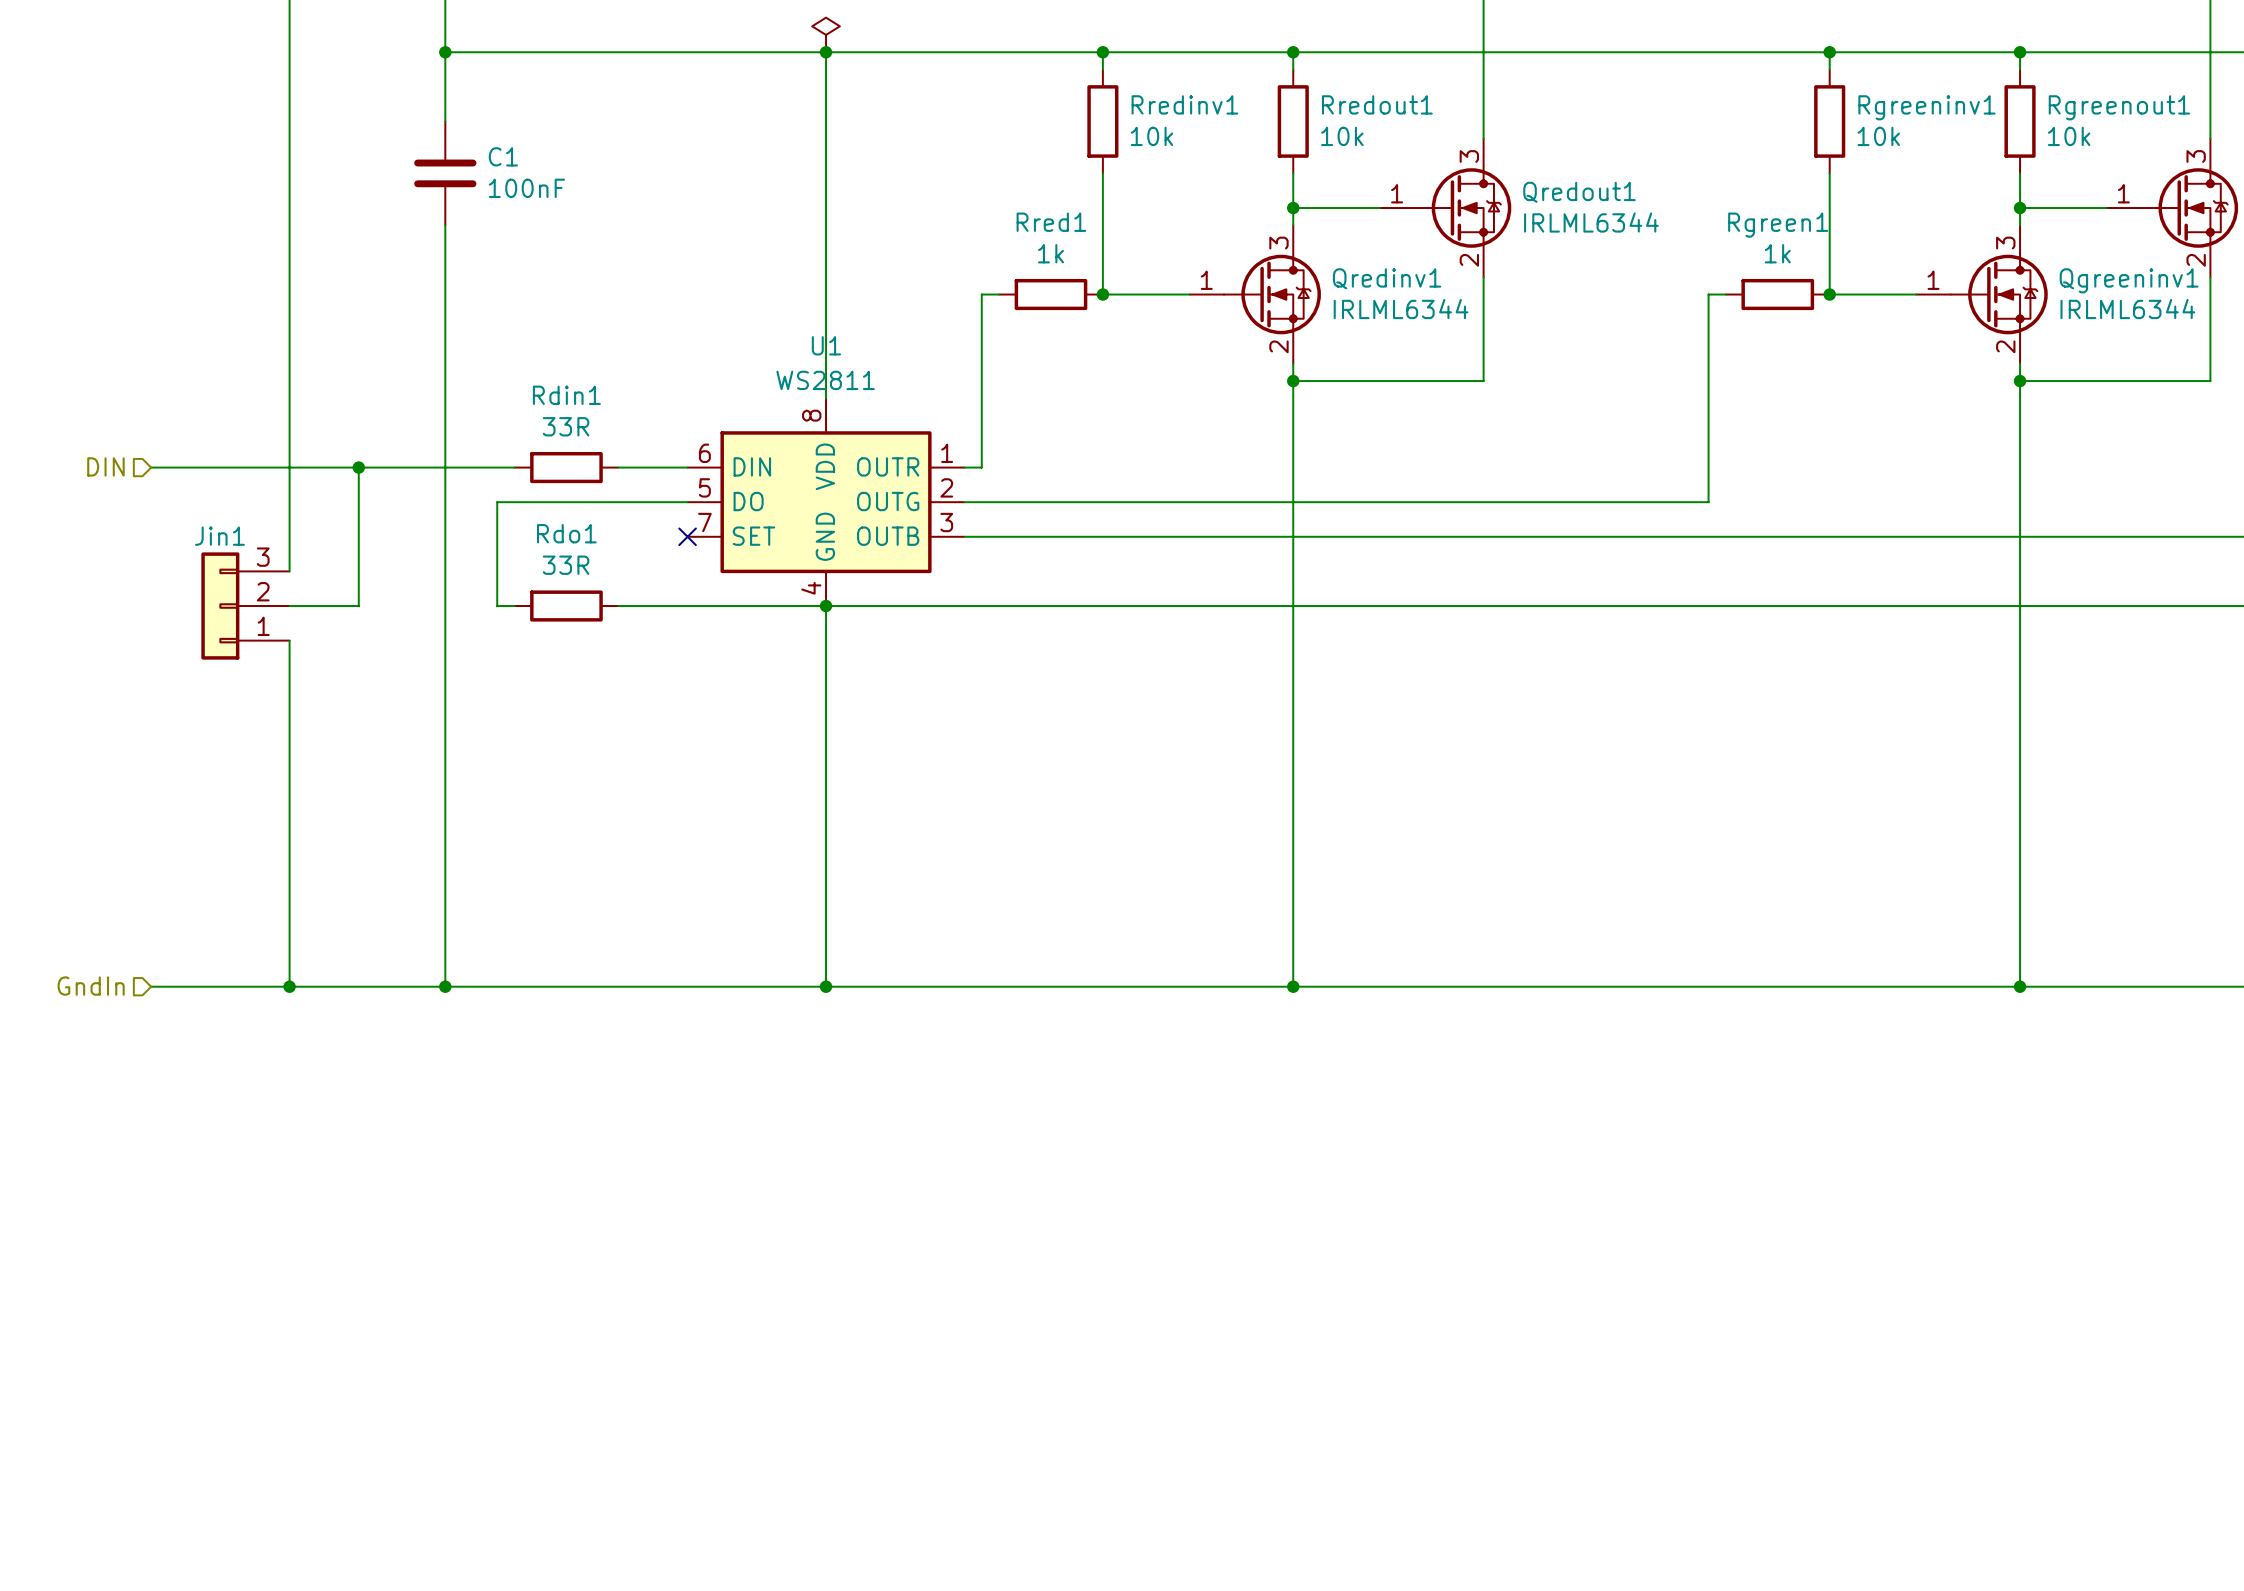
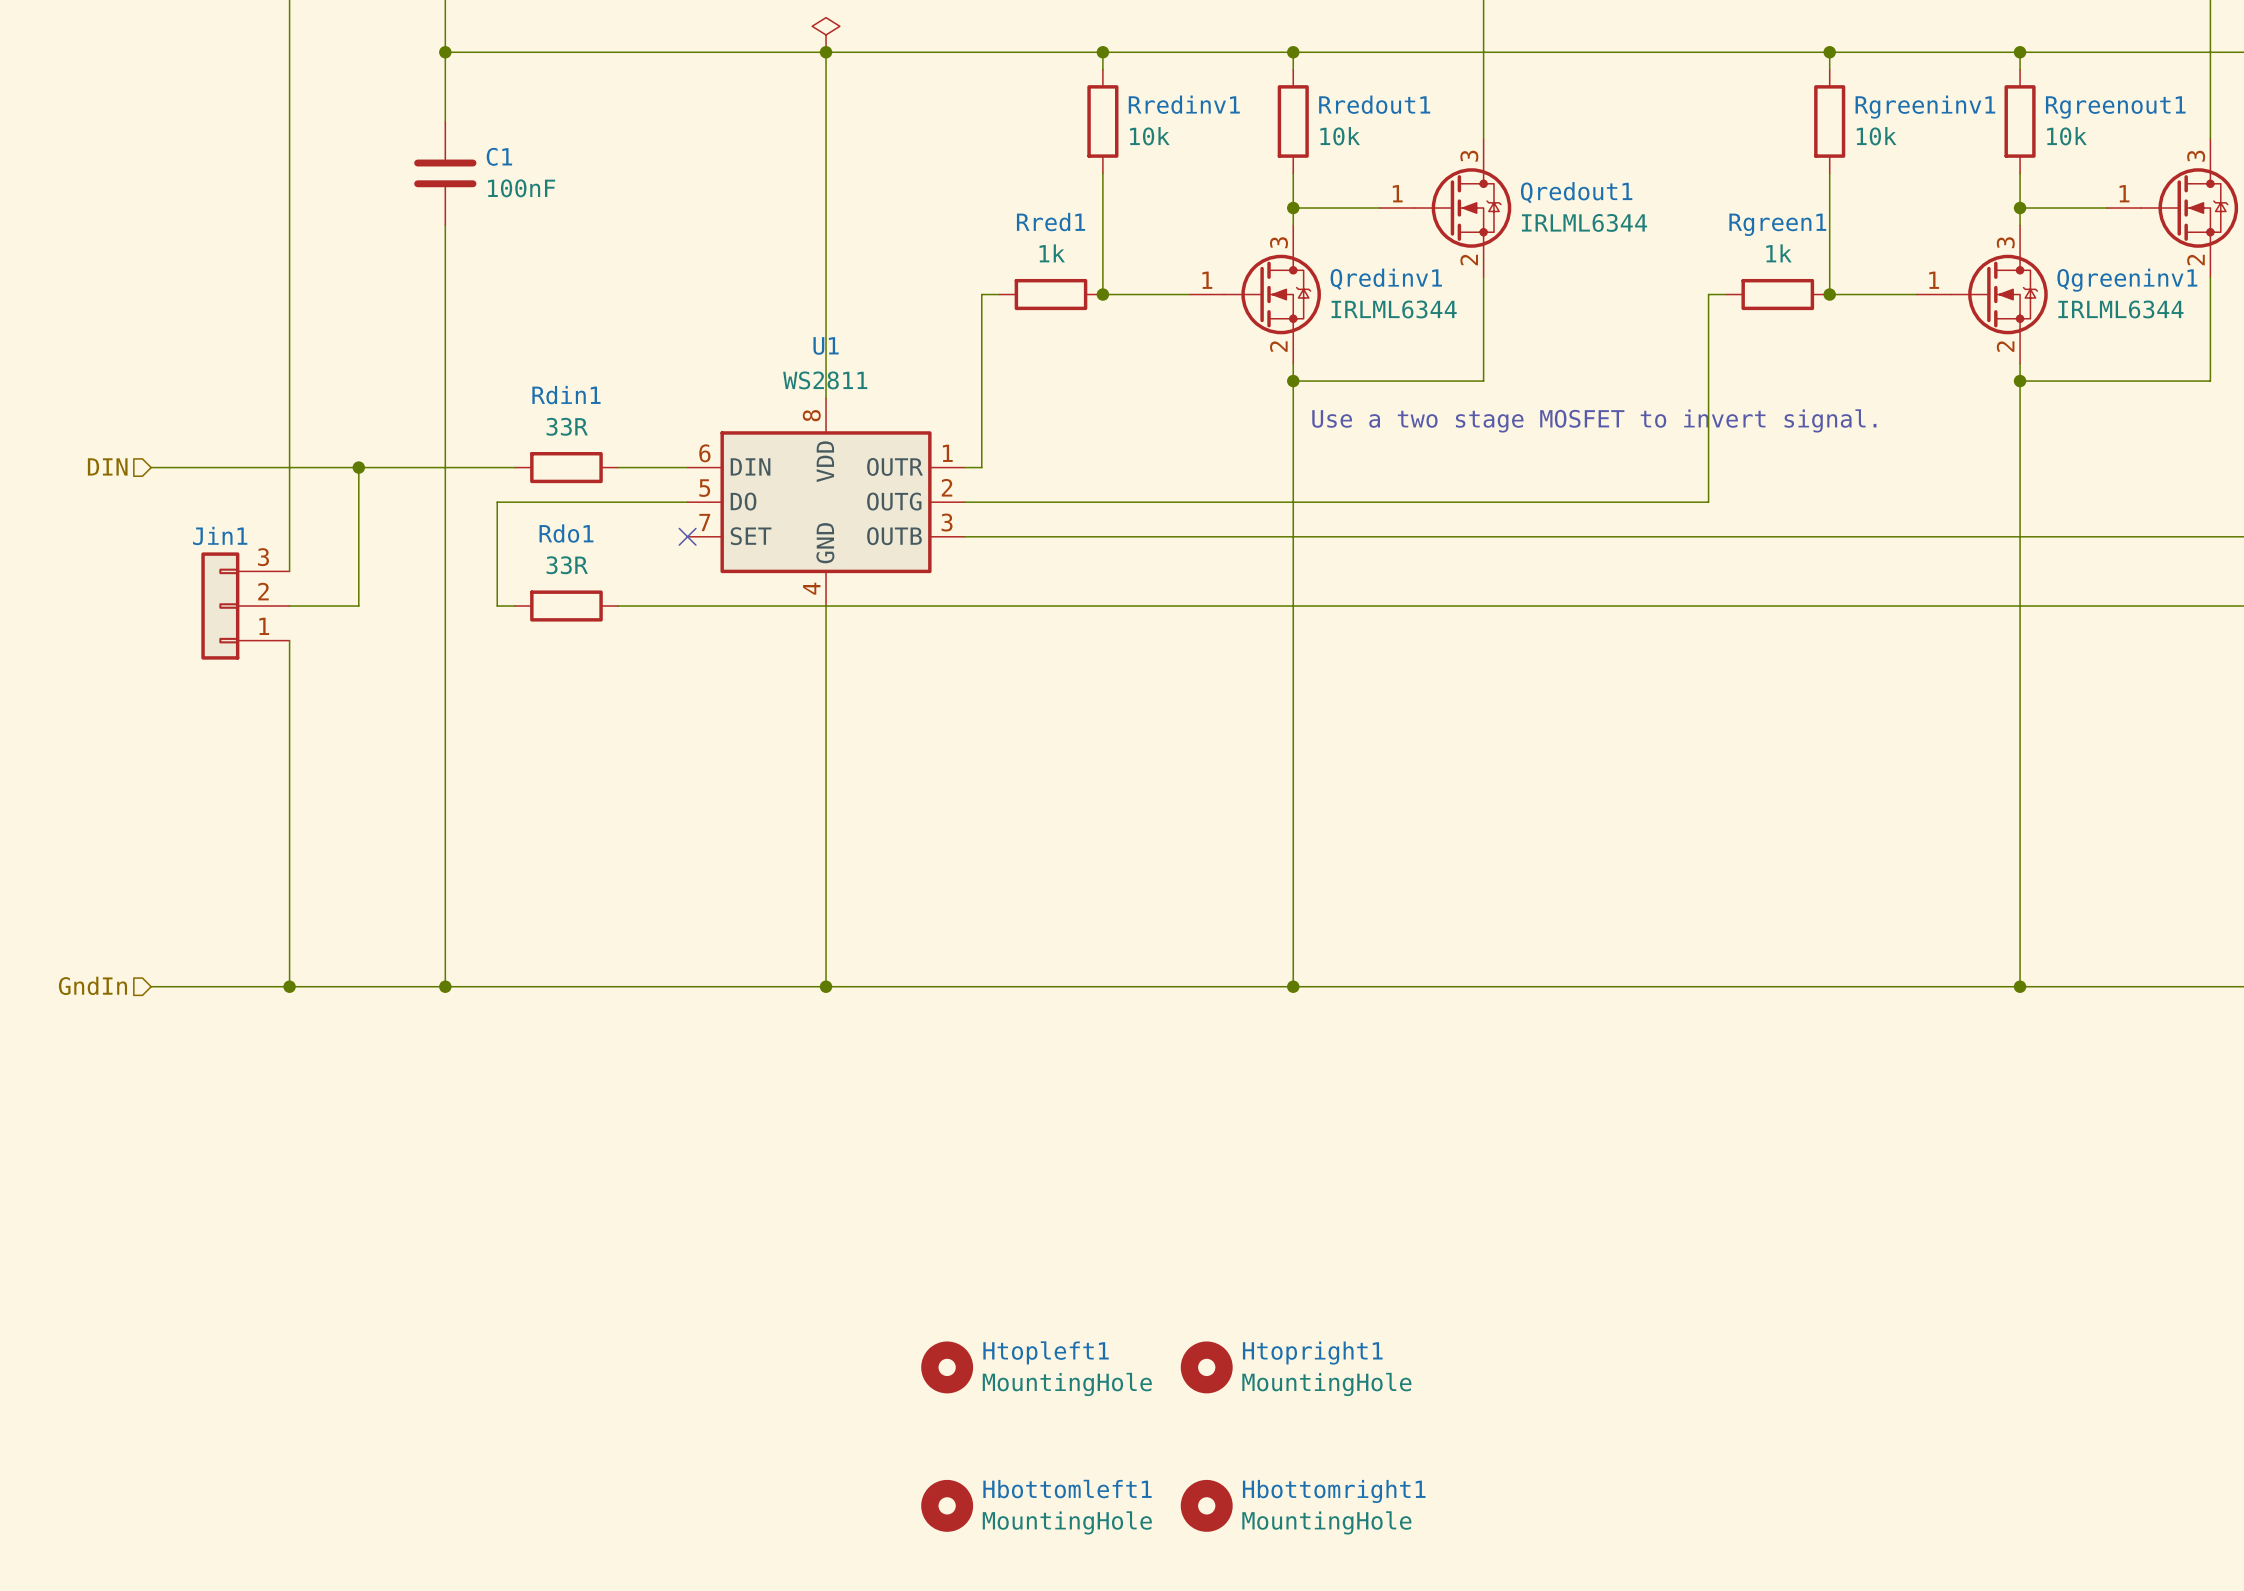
text: none -> Use a two stage MOSFET to invert signal. (1594, 420)
junction: (826, 606) -> none
Htopleft1: none -> MountingHole (947, 1367)
Htopright1: none -> MountingHole (1206, 1367)
Hbottomleft1: none -> MountingHole (947, 1505)
Hbottomright1: none -> MountingHole (1206, 1505)

